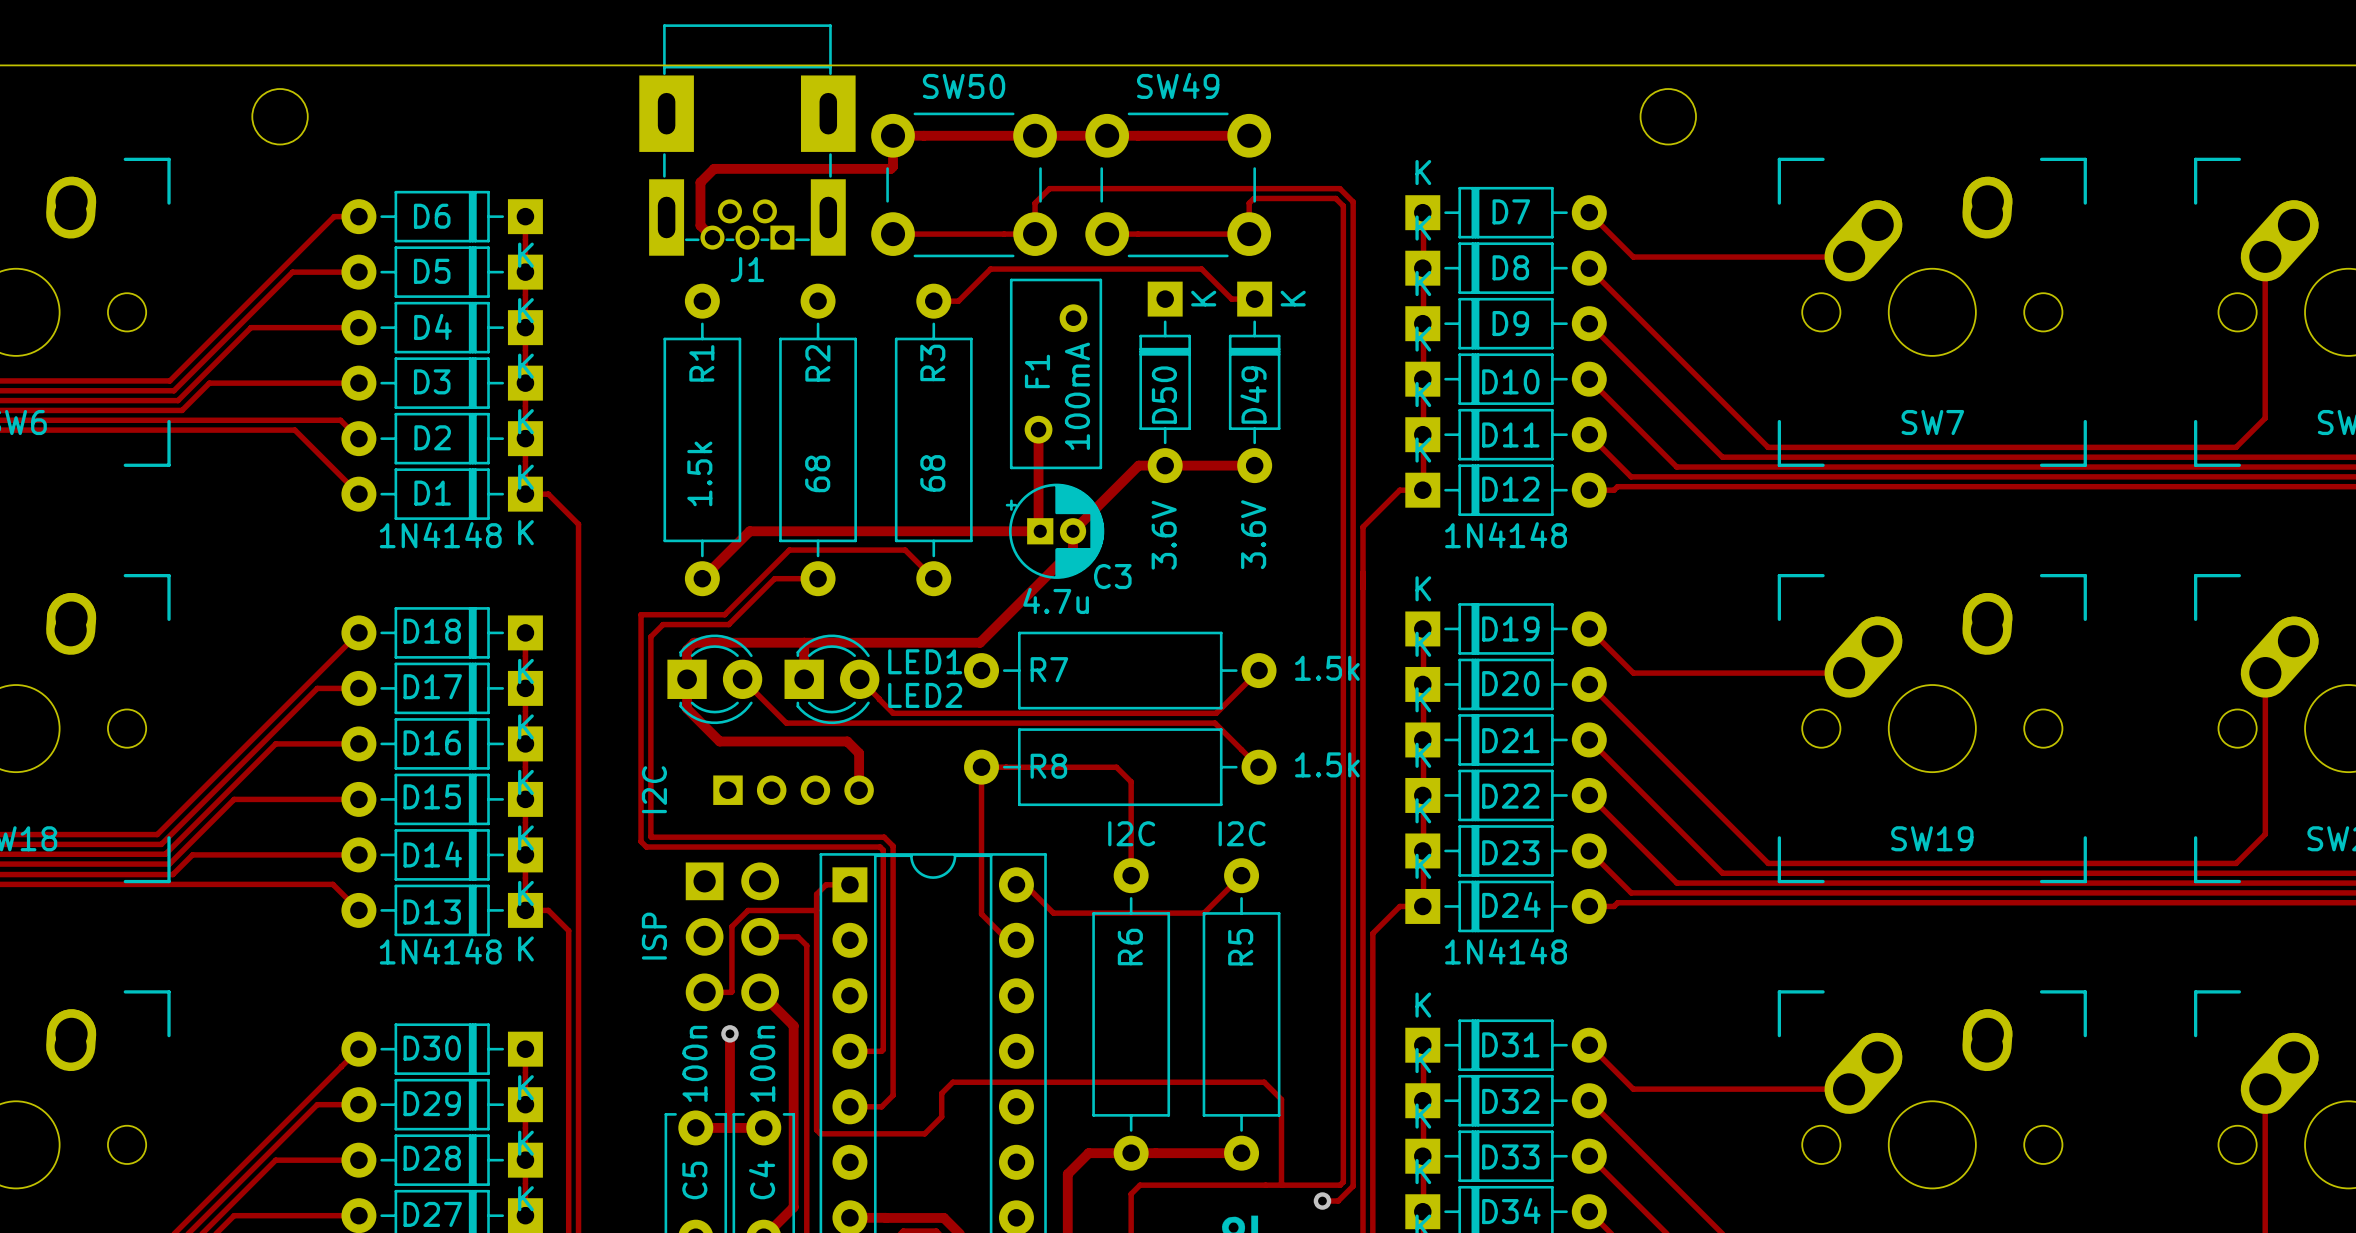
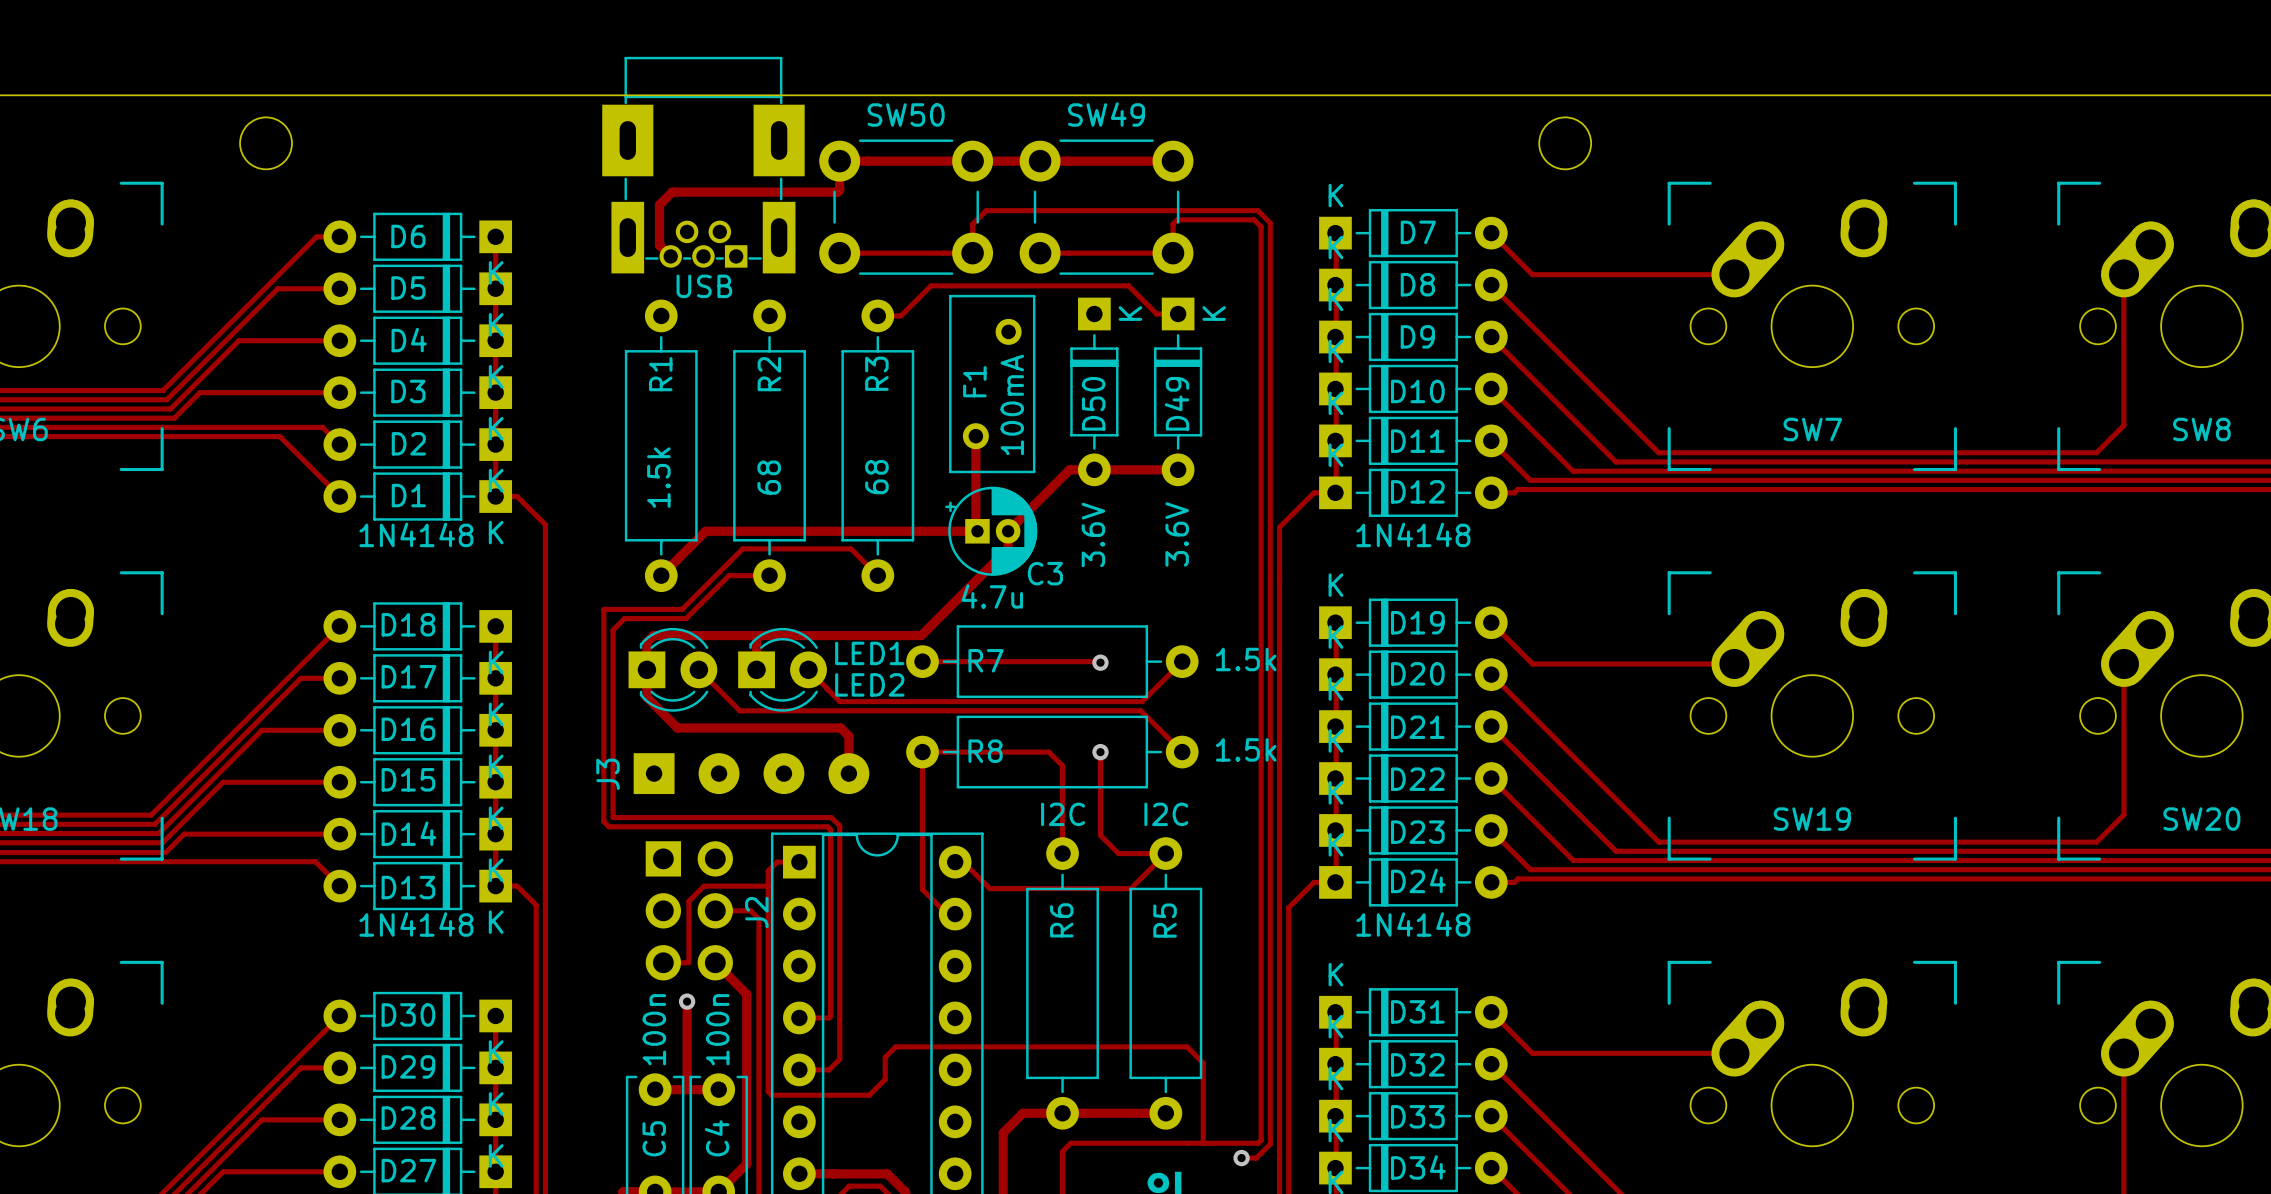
J1 name: J1 (747, 269) -> USB (704, 286)
track: none -> (922, 661) (1100, 662)
via: none -> (1100, 662)
track: (847, 741) (859, 753) (859, 790) -> (796, 728) (840, 728) (848, 736) (848, 773)
track: none -> (1100, 752) (1100, 835) (1118, 853) (1165, 853)
via: none -> (1100, 752)
I2C: (793, 790) -> none
J3: none -> (751, 773)
ISP name: ISP (654, 936) -> J2 (756, 912)

